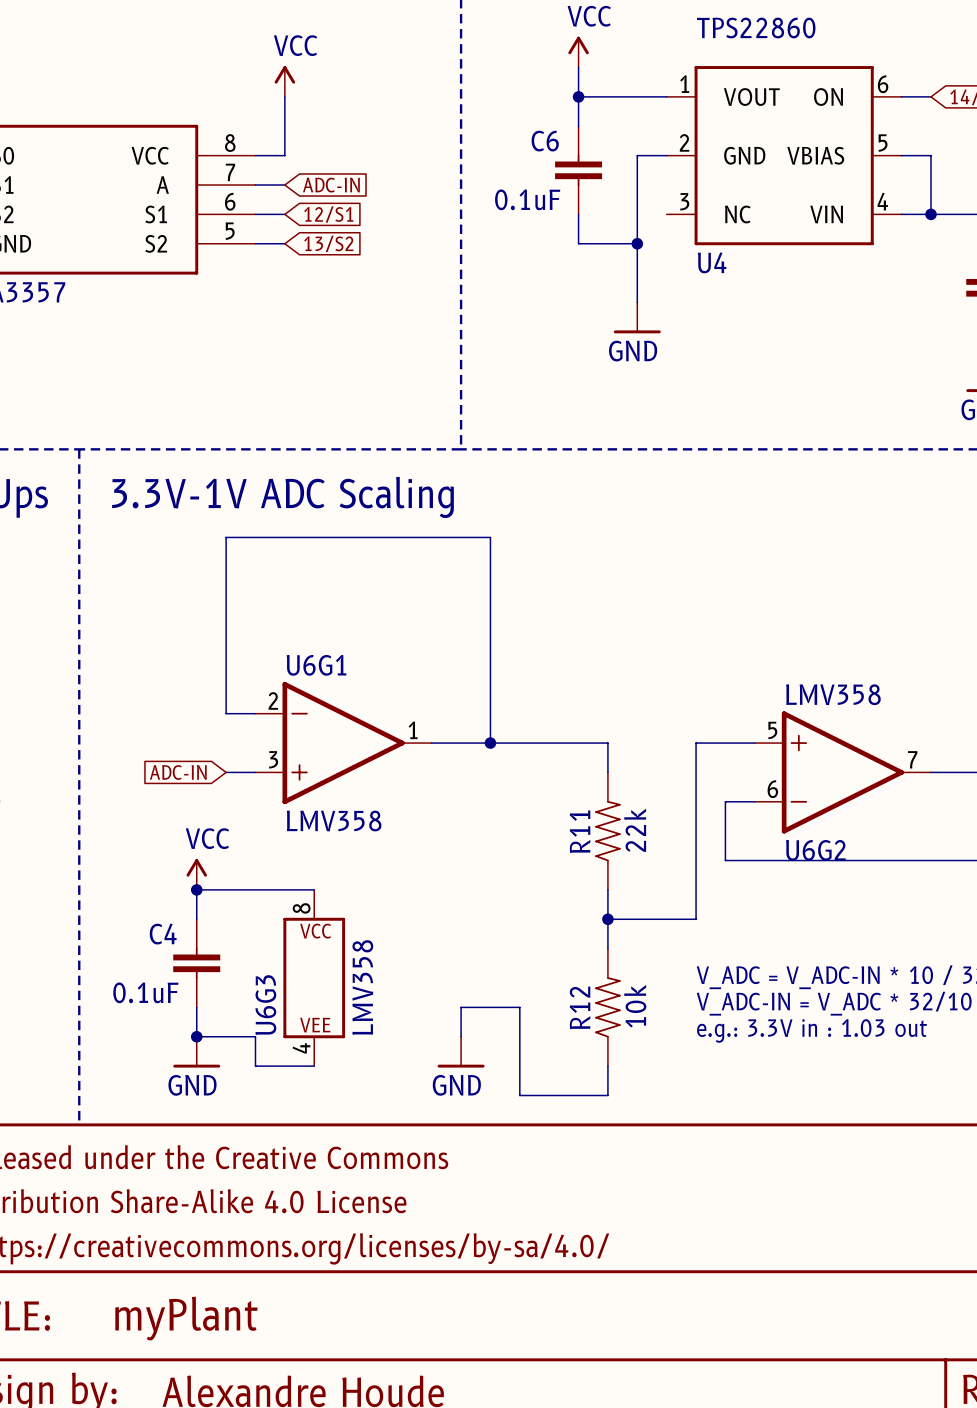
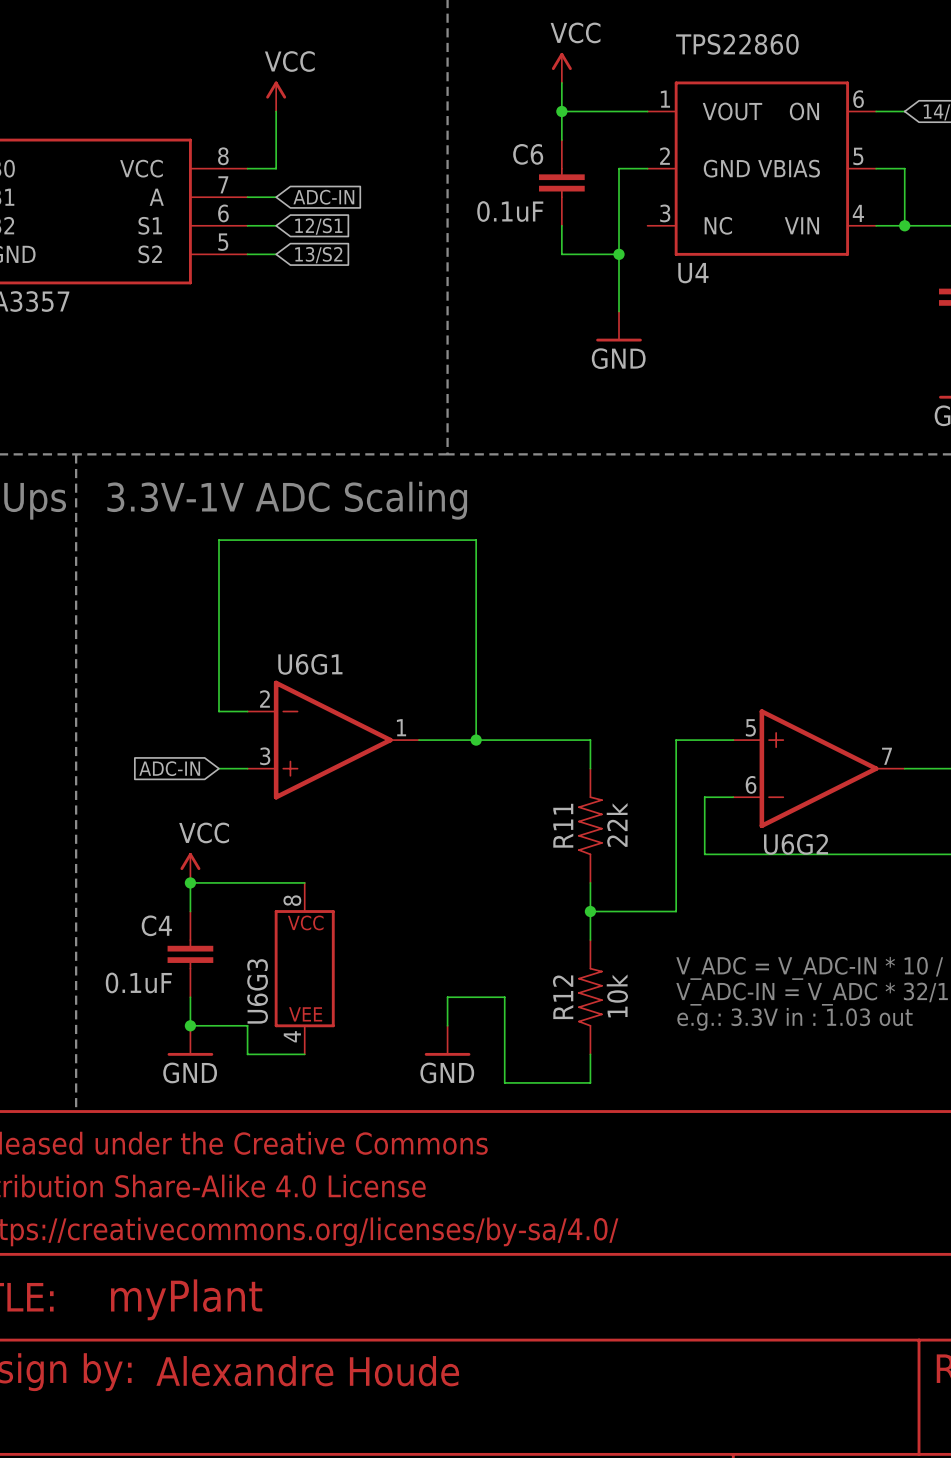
U6G2 value: LMV358 (833, 694) -> none
U6G1 value: LMV358 (334, 821) -> none
U6G3 value: LMV358 (362, 987) -> none

